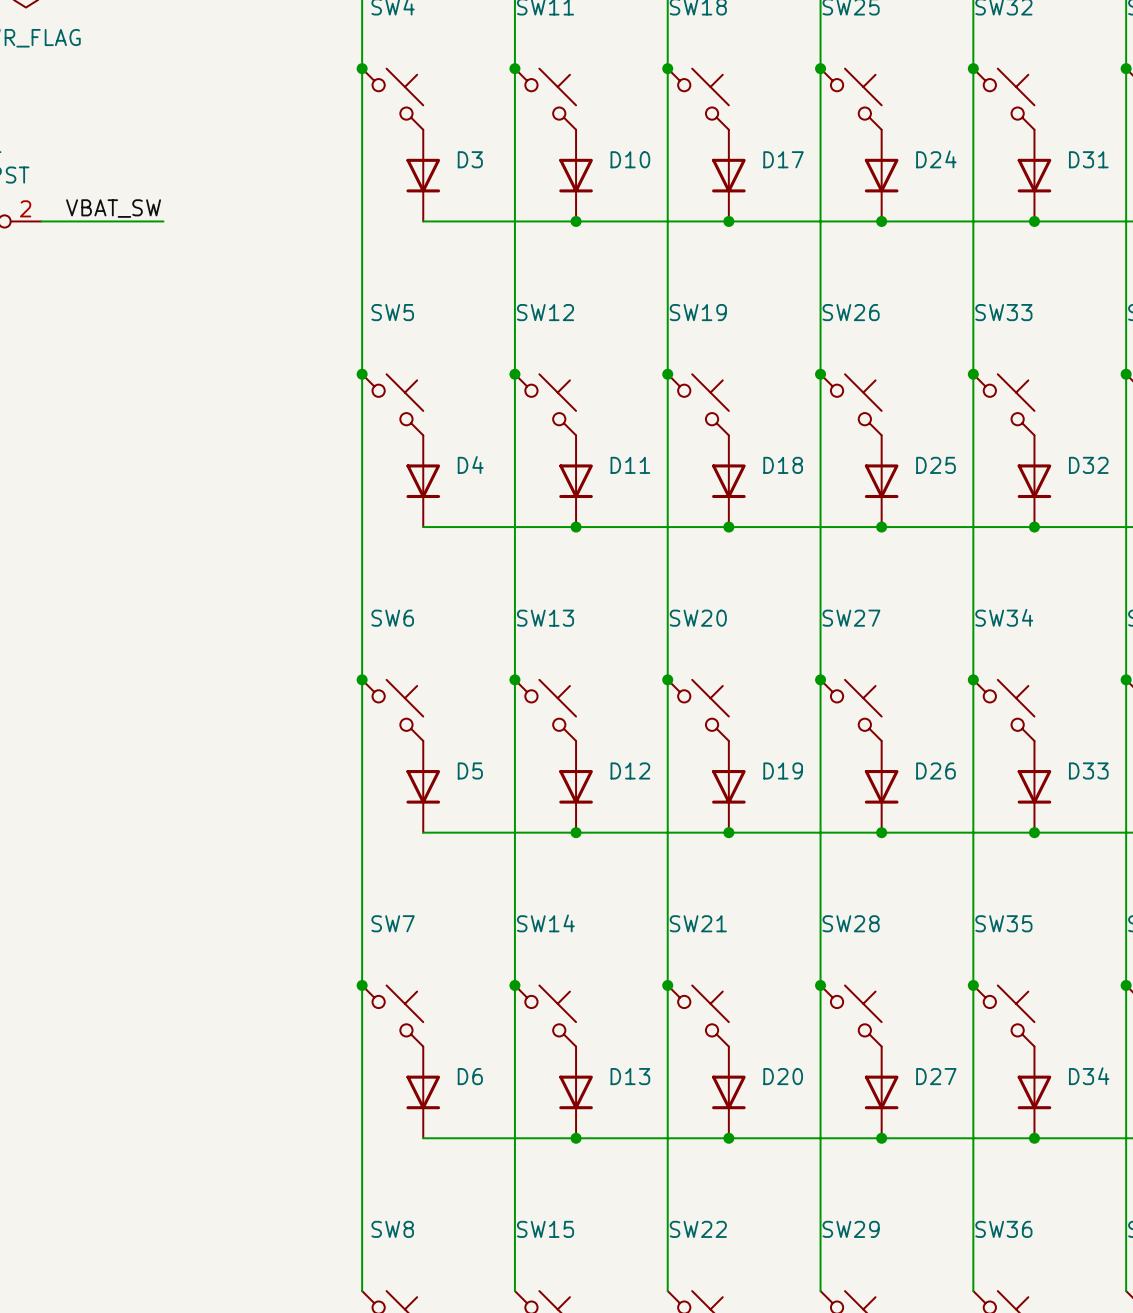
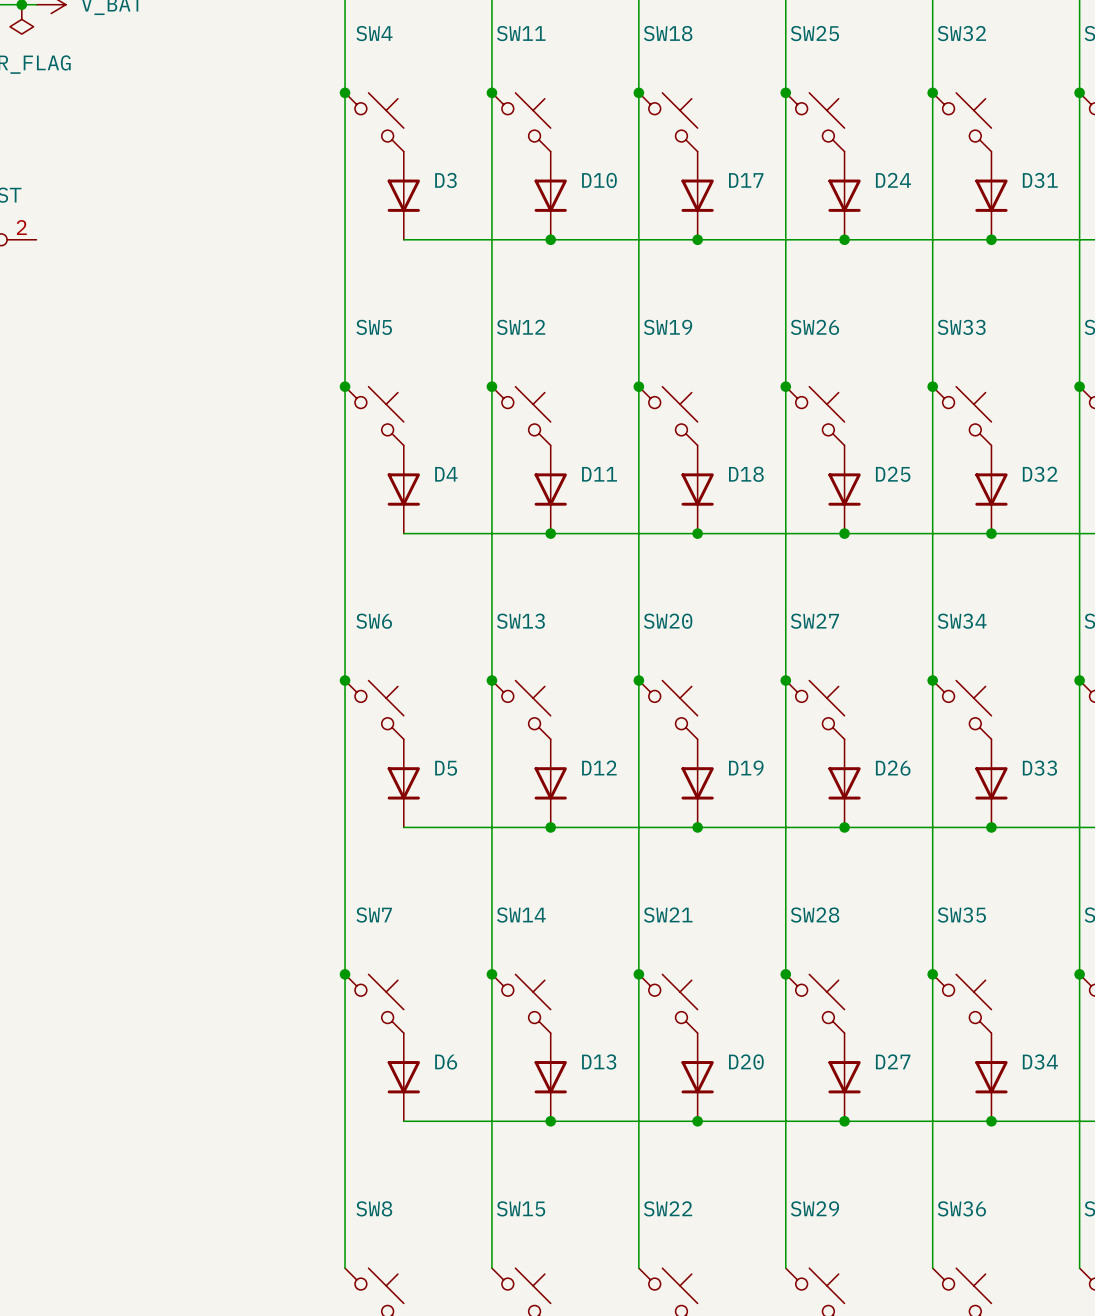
label: VBAT_SW (113, 208) -> none
wire: (41, 221) (163, 221) -> none

